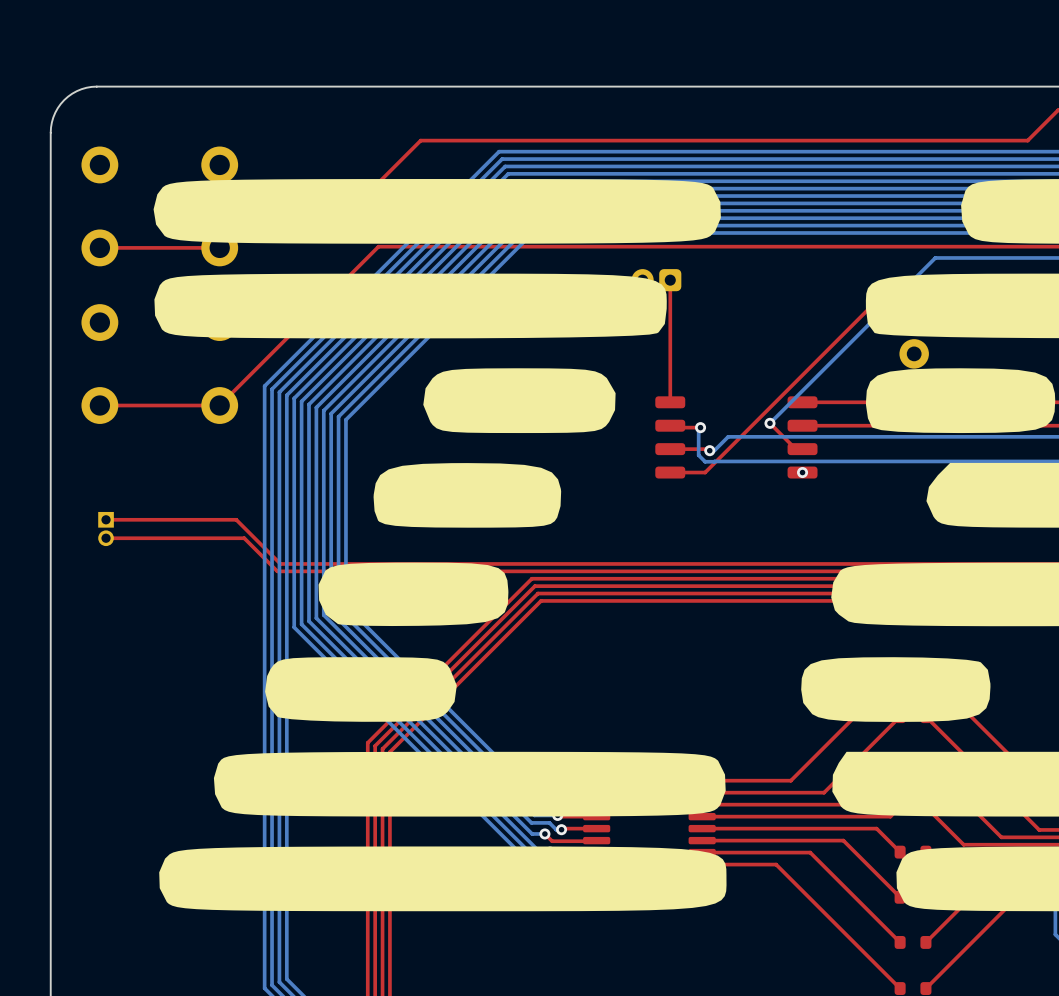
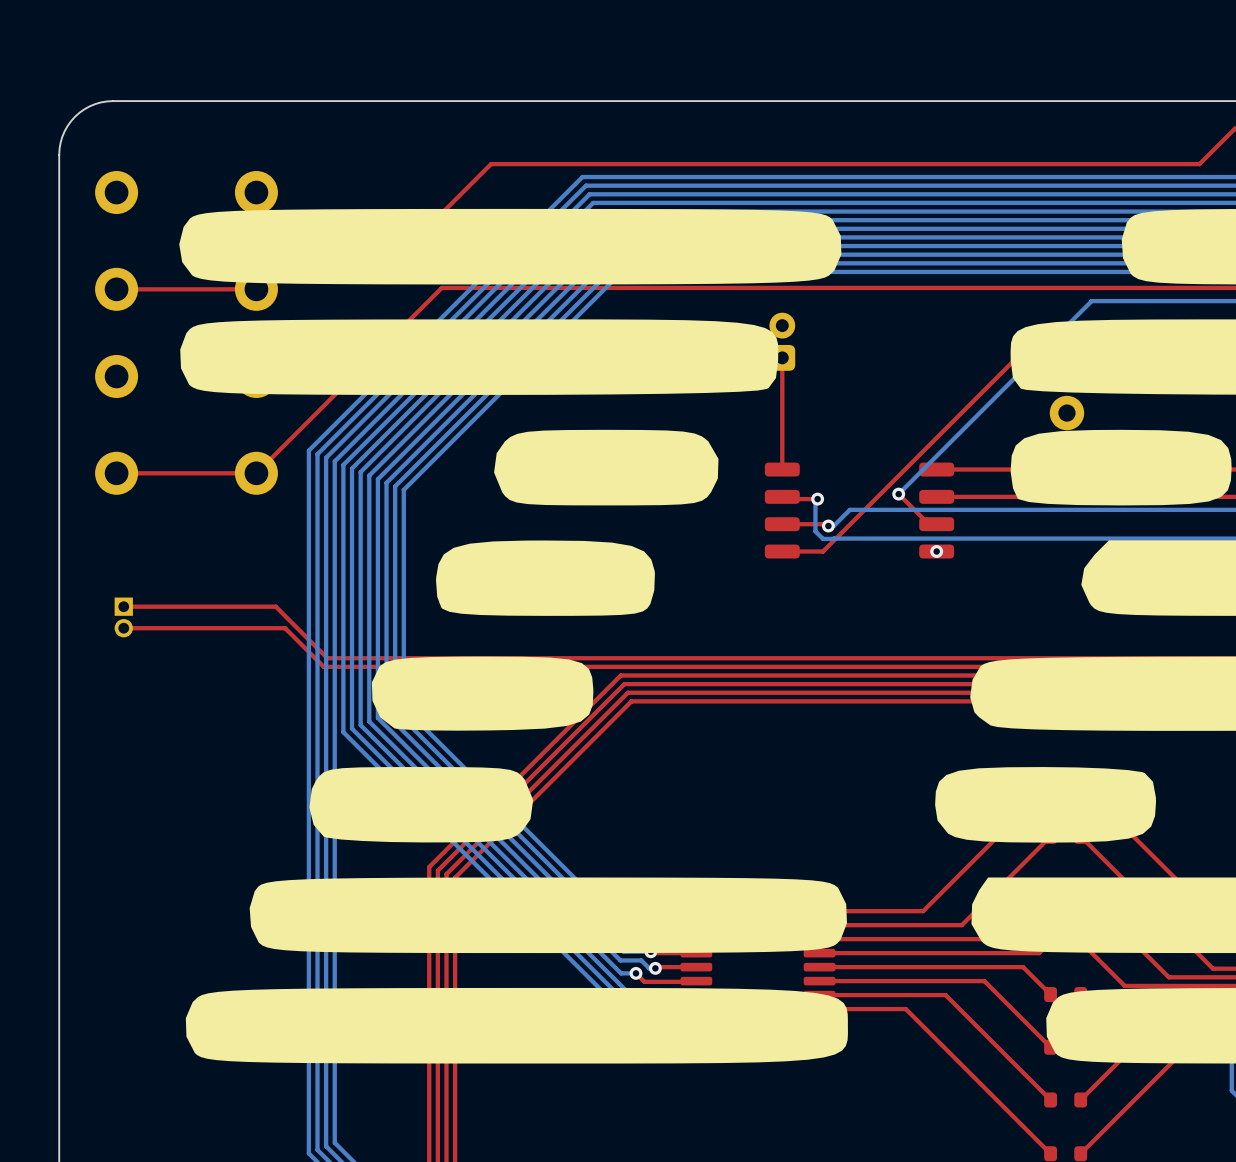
part rotation: 0° (656, 280) -> 90° clockwise (782, 341)
top track: (670, 280) (670, 306) -> none

